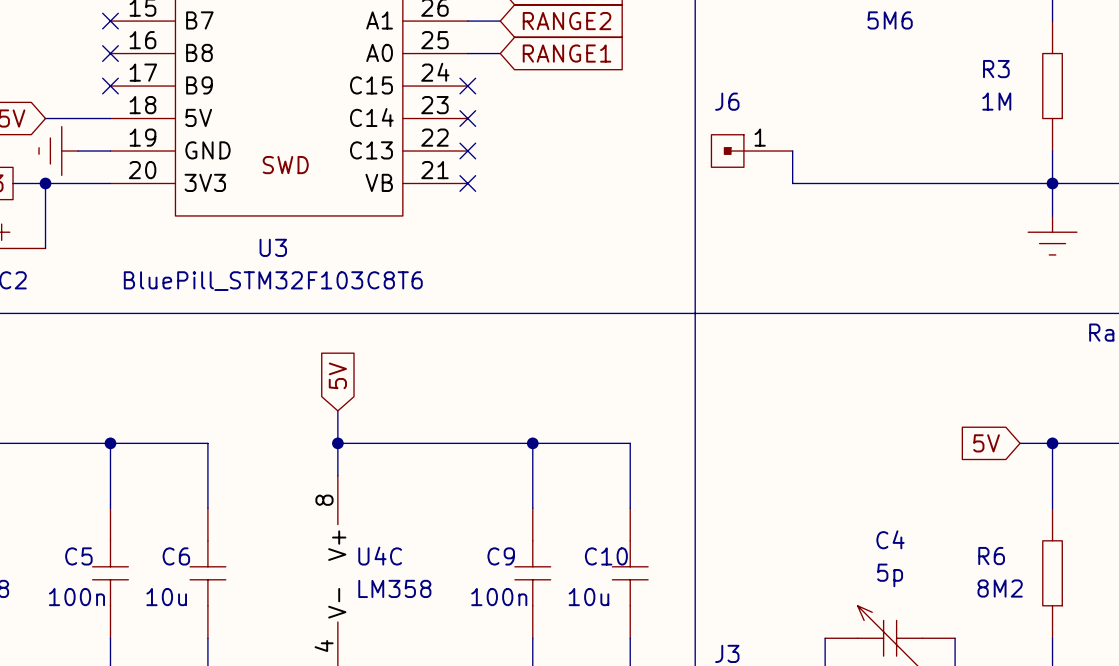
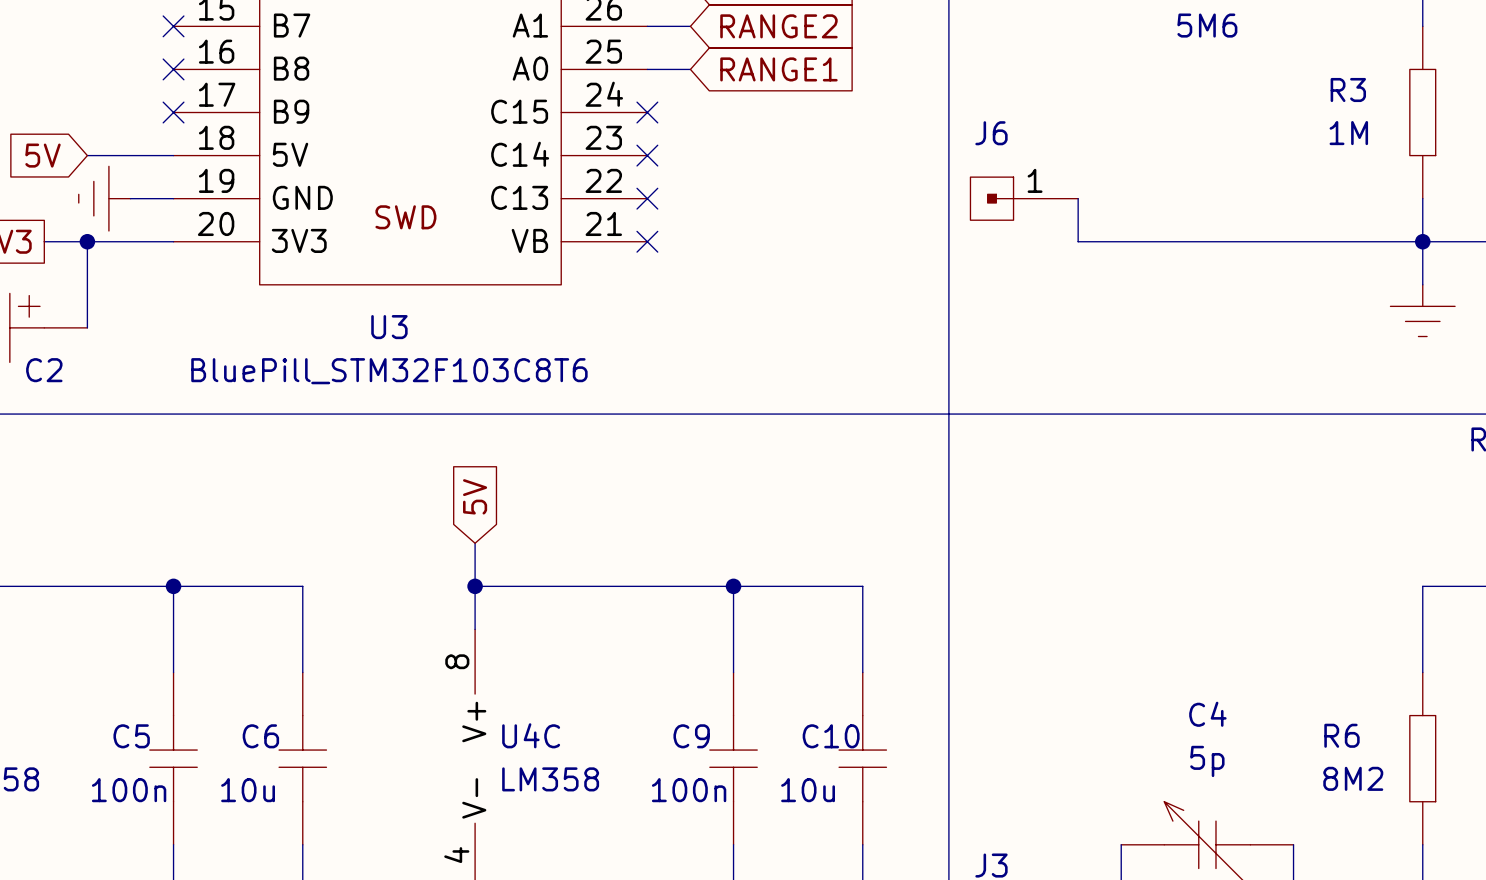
global label: 5V (986, 443) -> none
wire: (1020, 443) (1052, 443) -> none
junction: (1052, 443) -> none

